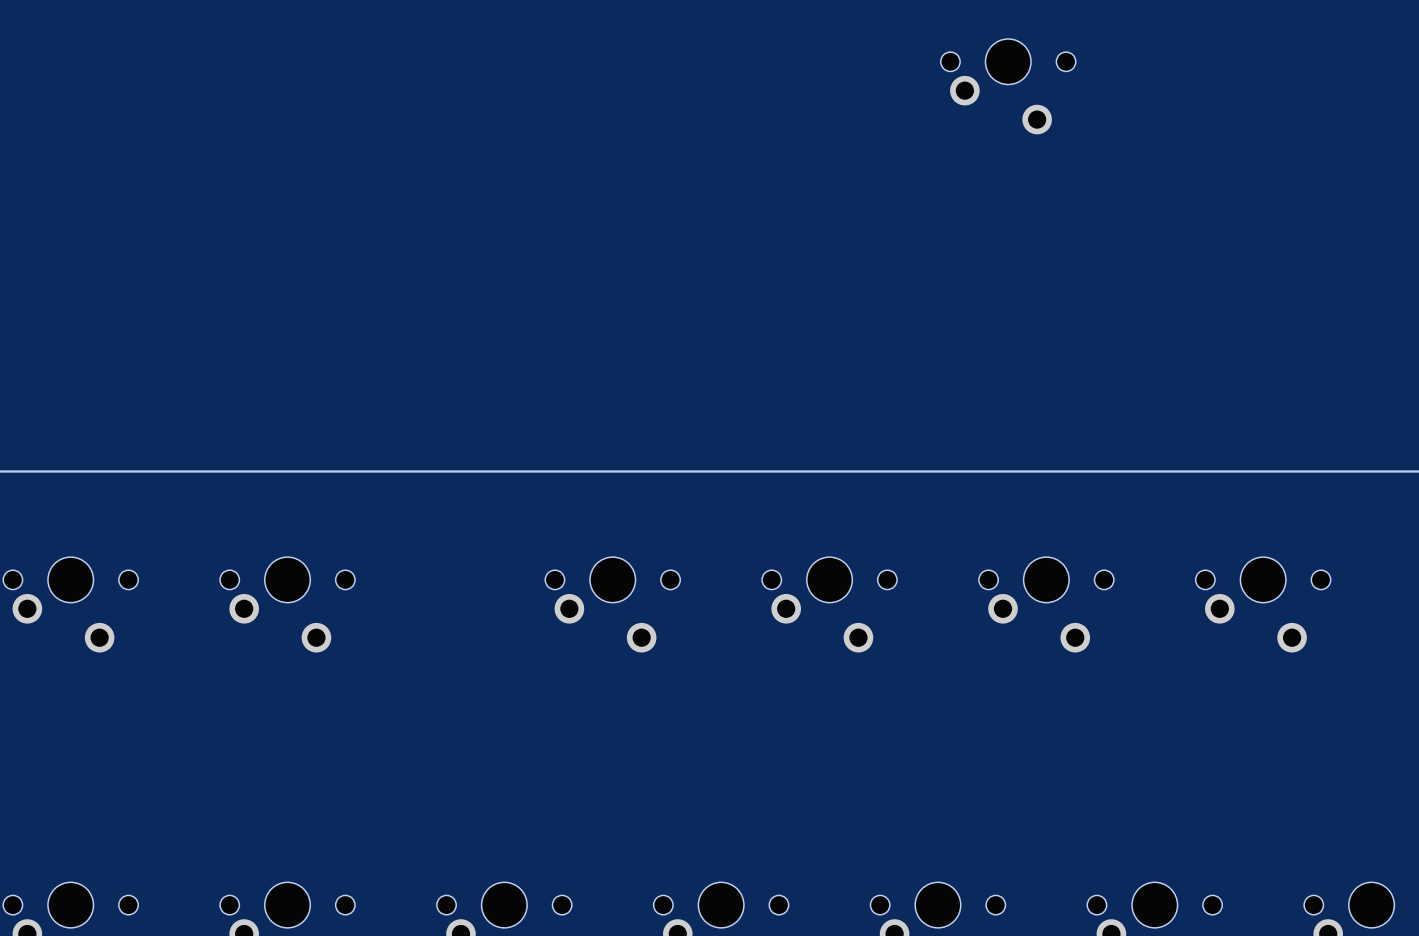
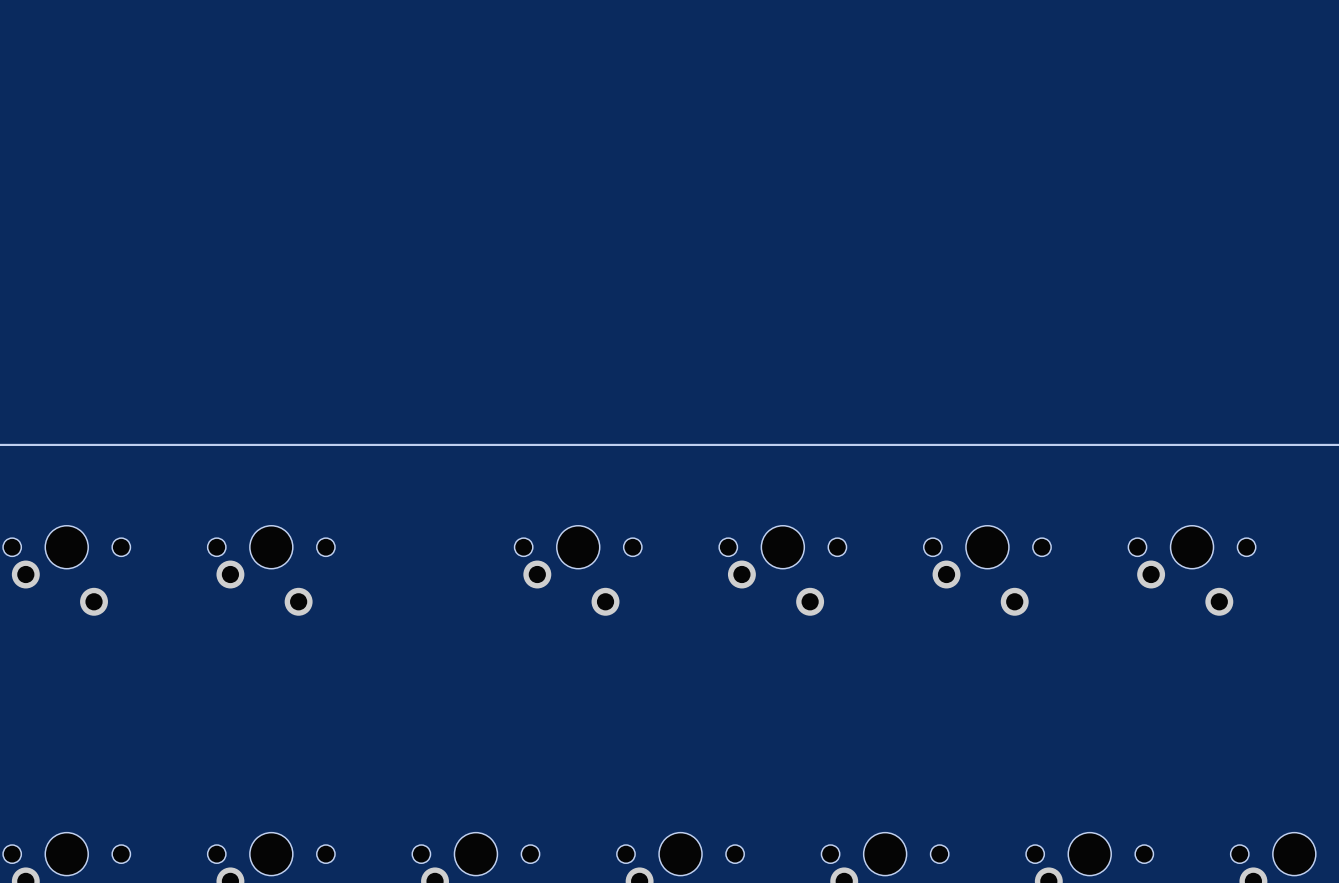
part: (1008, 86) -> none

